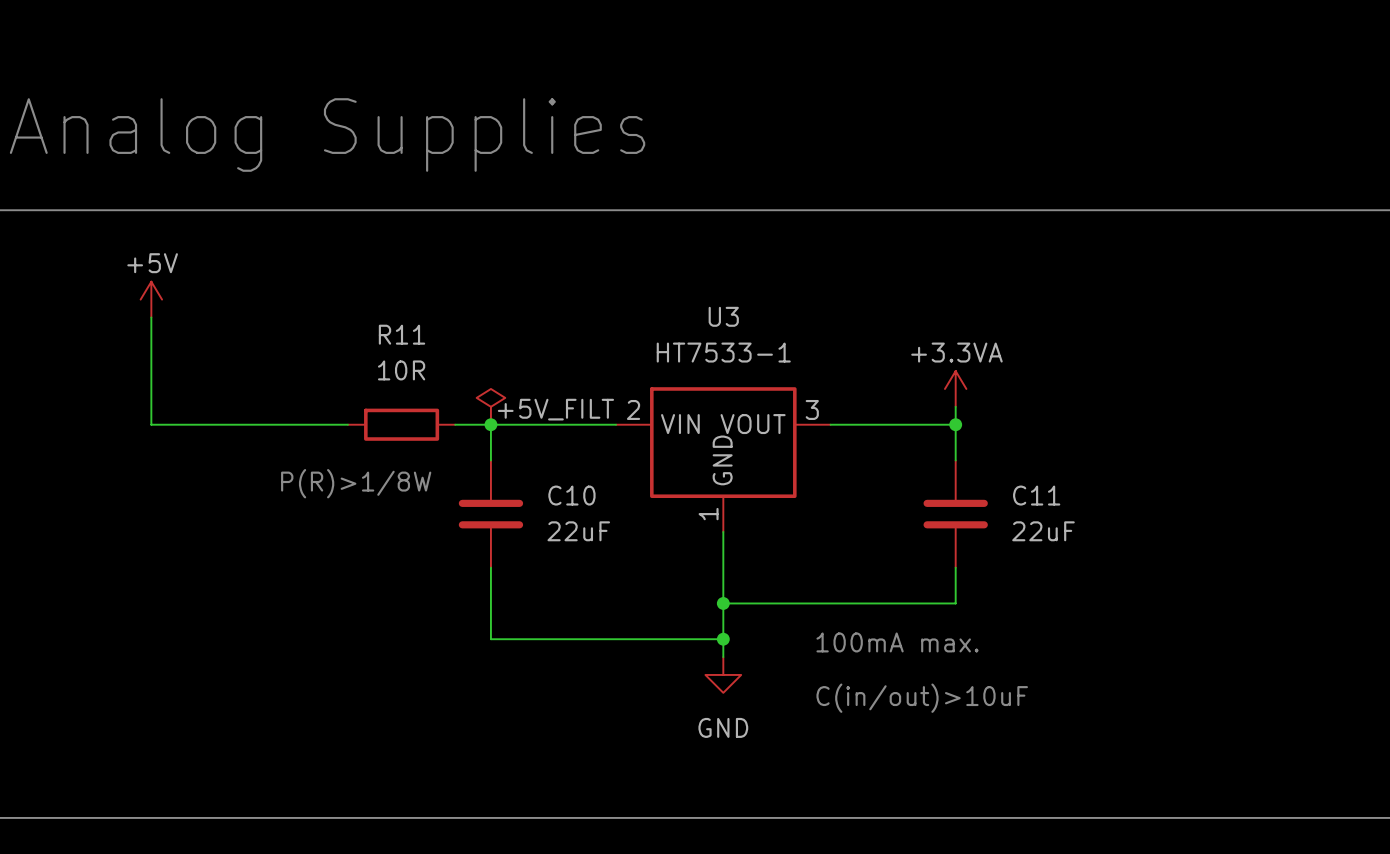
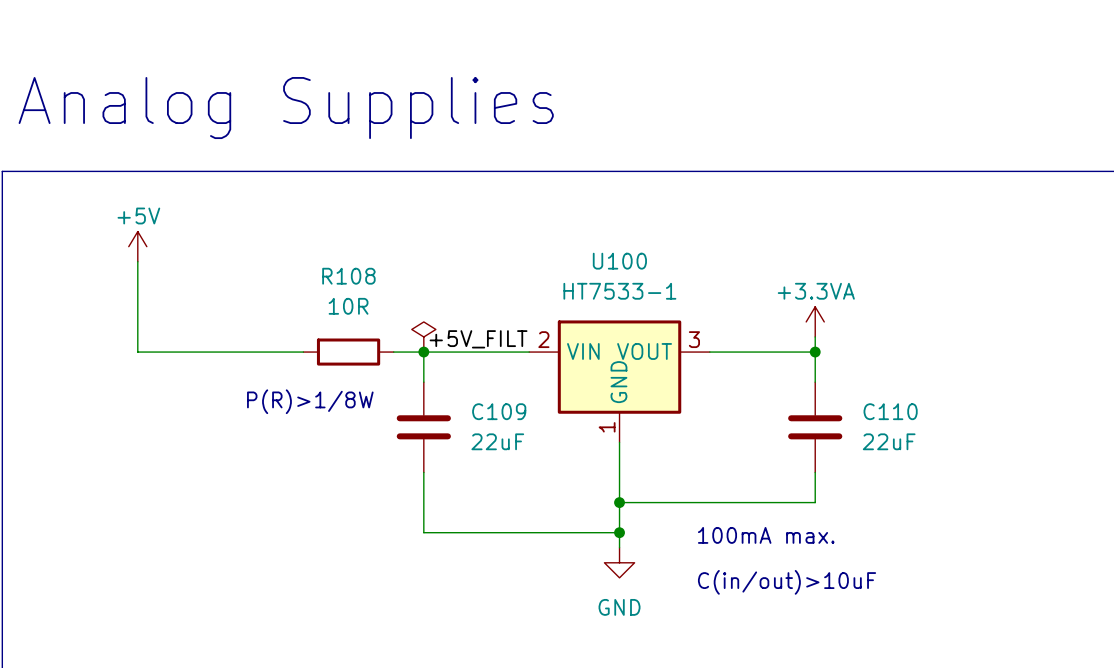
U3 name: U3 (723, 316) -> U100 (619, 261)
R11 name: R11 (402, 334) -> R108 (348, 276)
C10 name: C10 (571, 495) -> C109 (499, 411)
C11 name: C11 (1036, 495) -> C110 (890, 411)

